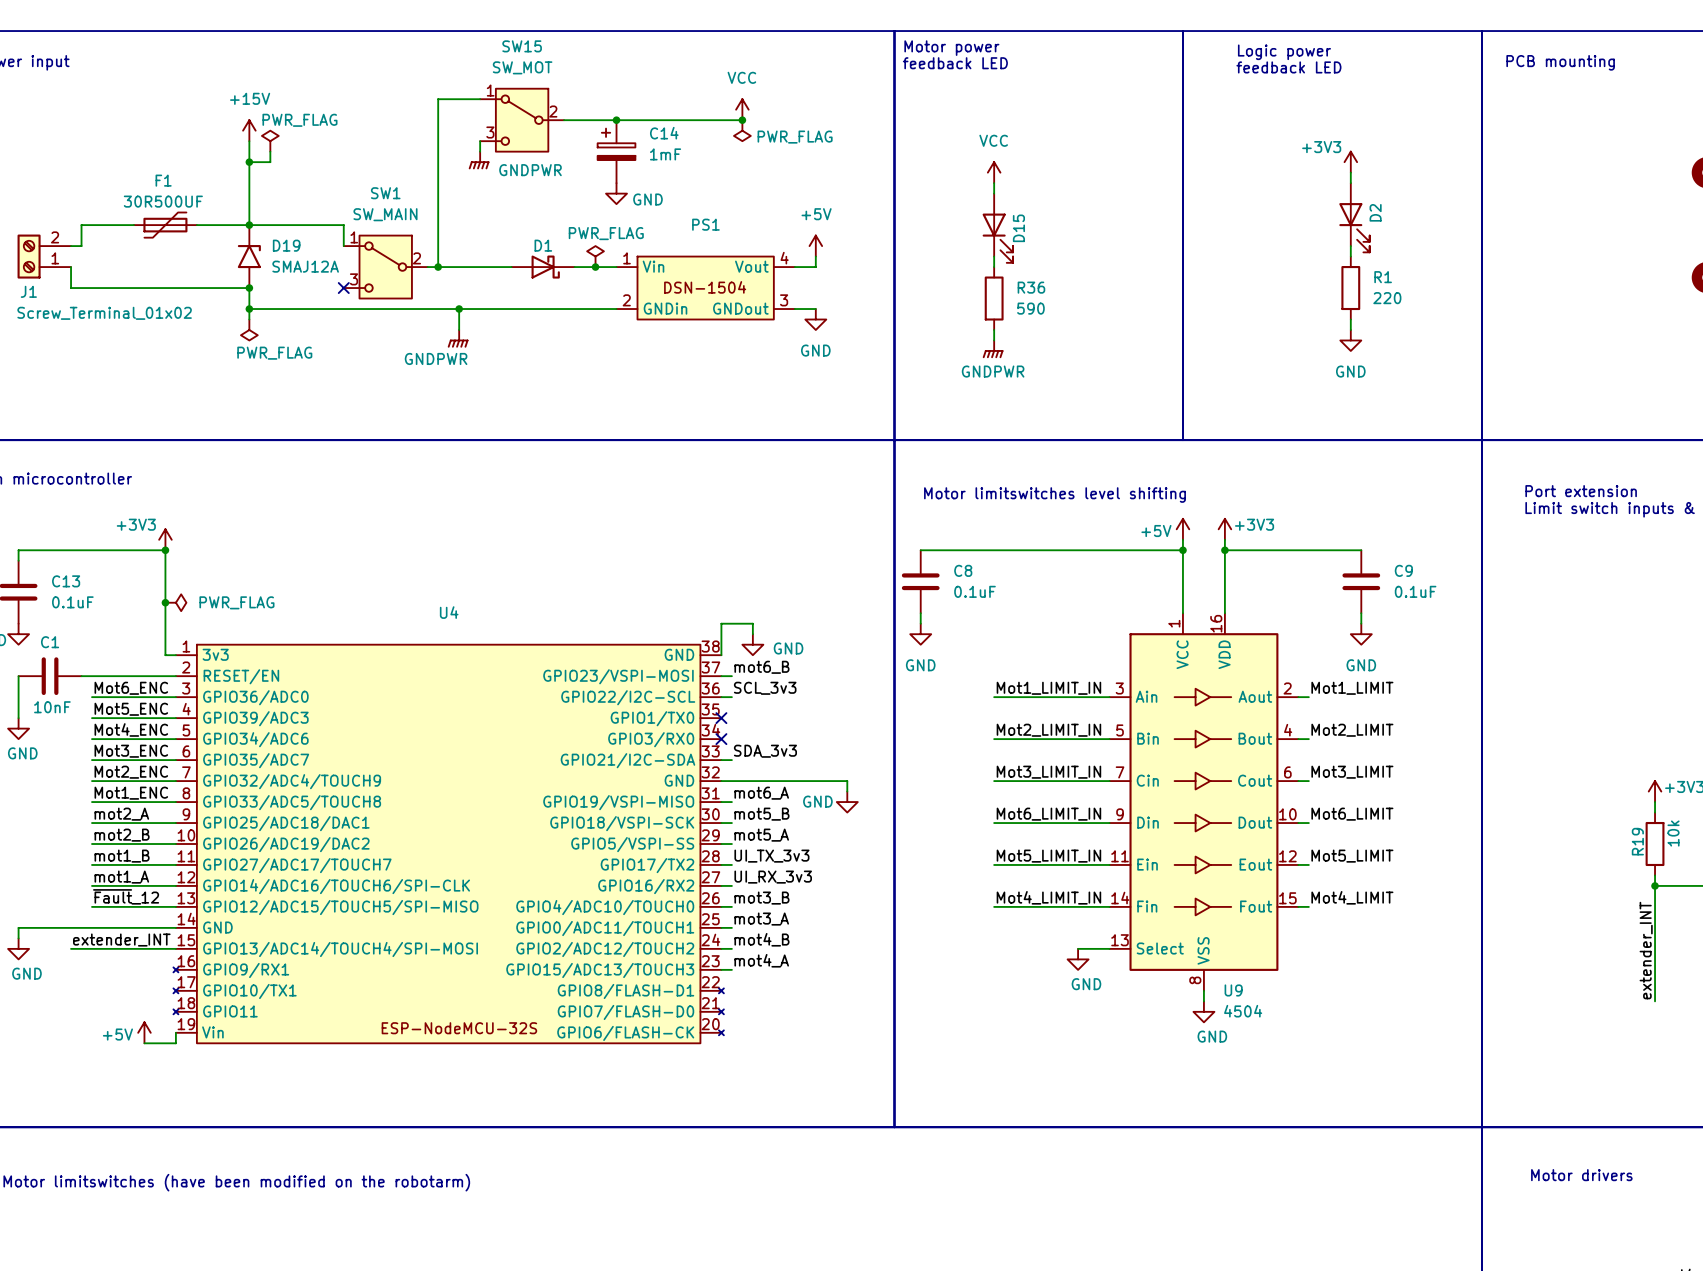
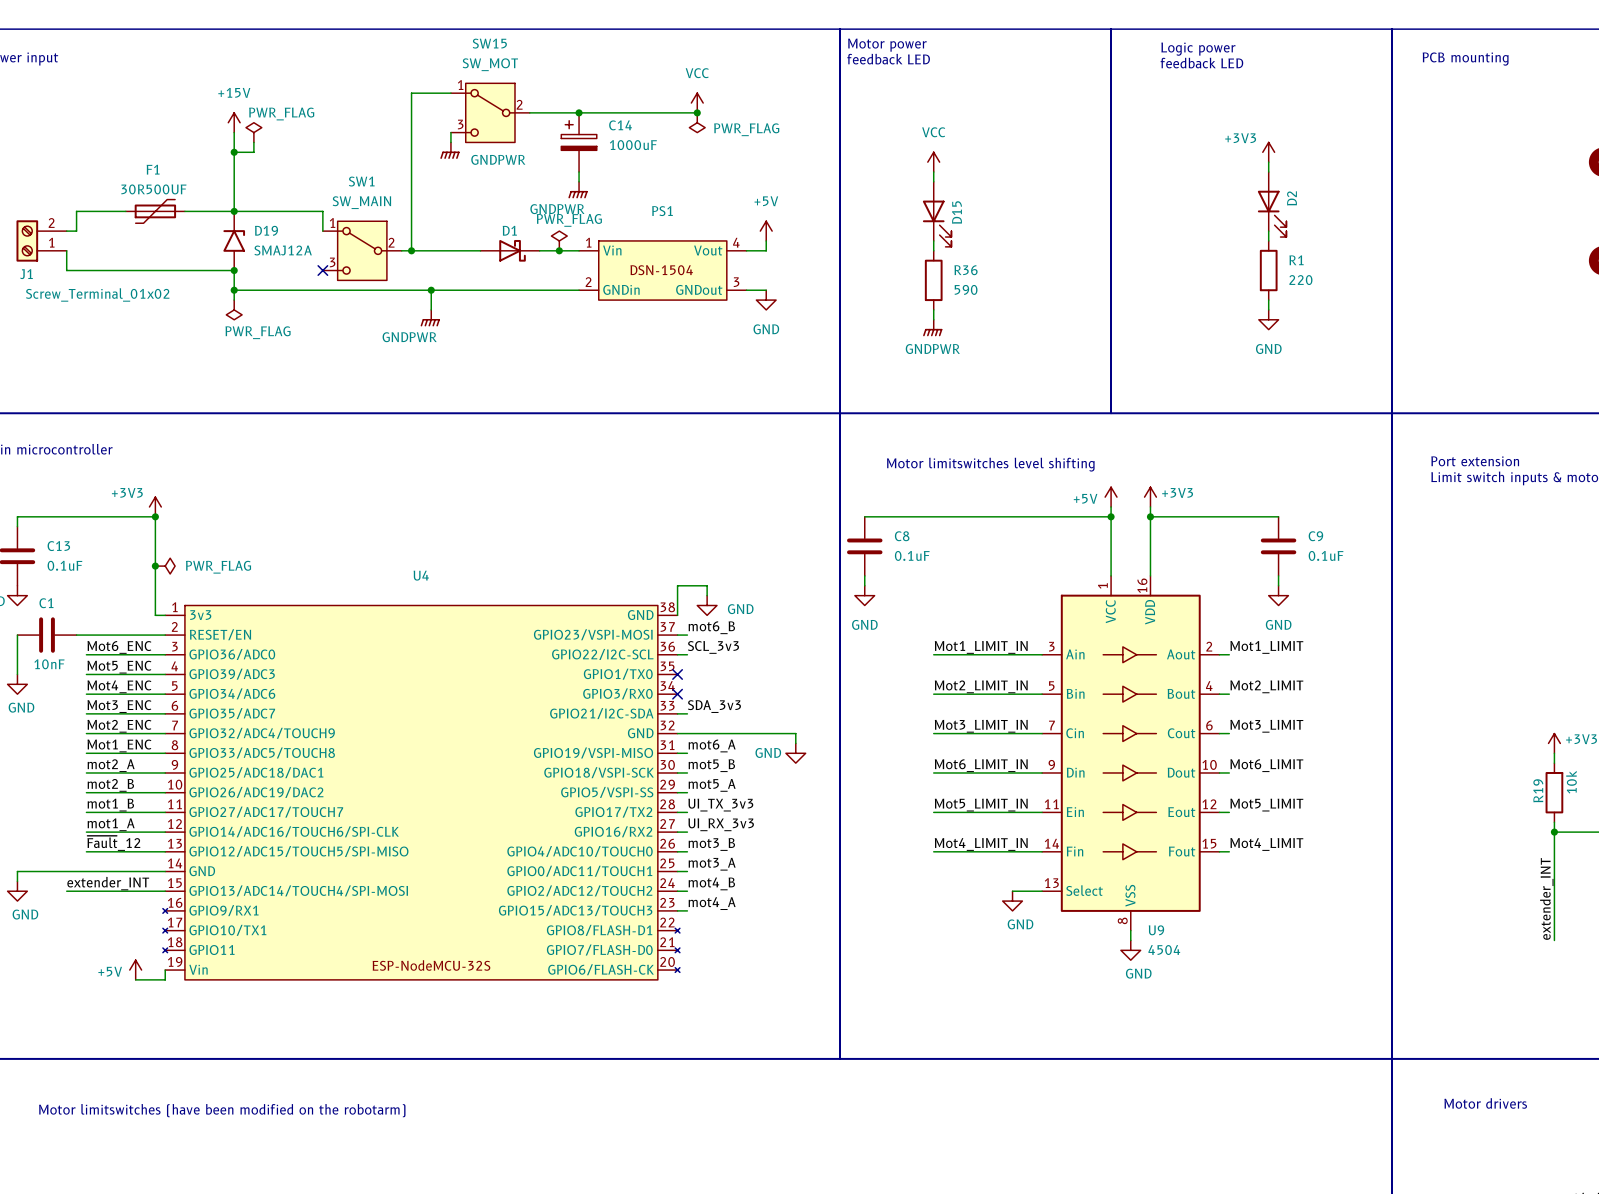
C14 value: 1mF (665, 154) -> 1000uF (633, 145)
power symbol: GND (616, 193) -> none
power symbol: none -> GNDPWR (578, 190)

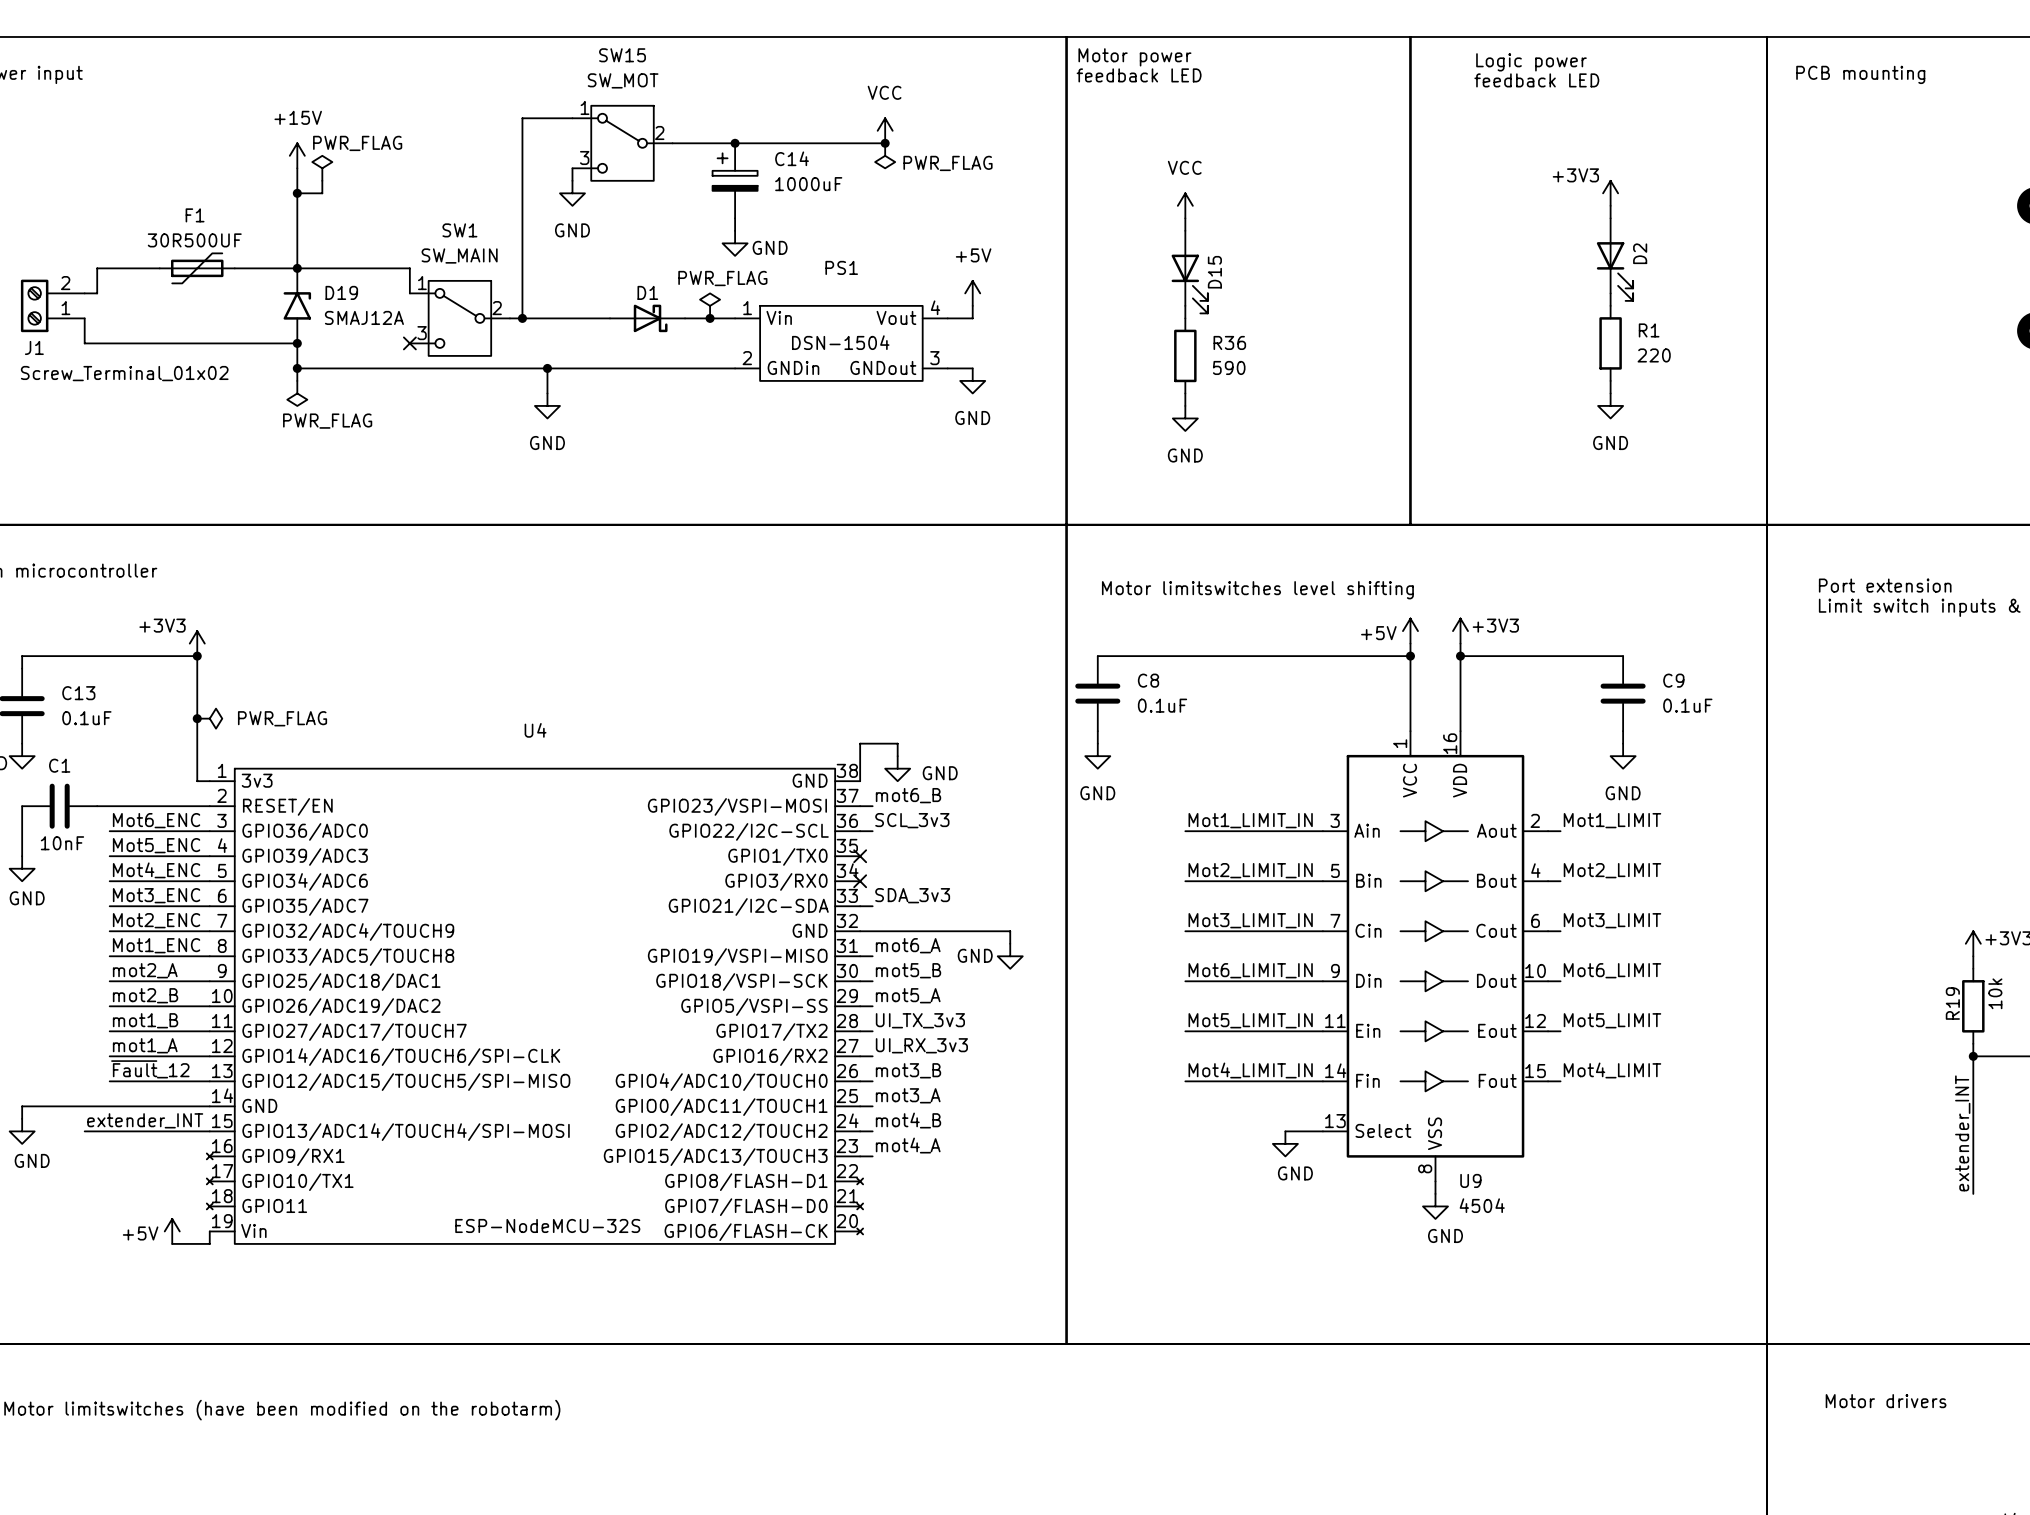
power symbol: GNDPWR (449, 150) -> GND (572, 193)
power symbol: GNDPWR (578, 190) -> GND (735, 243)
power symbol: GNDPWR (430, 318) -> GND (547, 405)
power symbol: GNDPWR (932, 328) -> GND (1185, 418)

